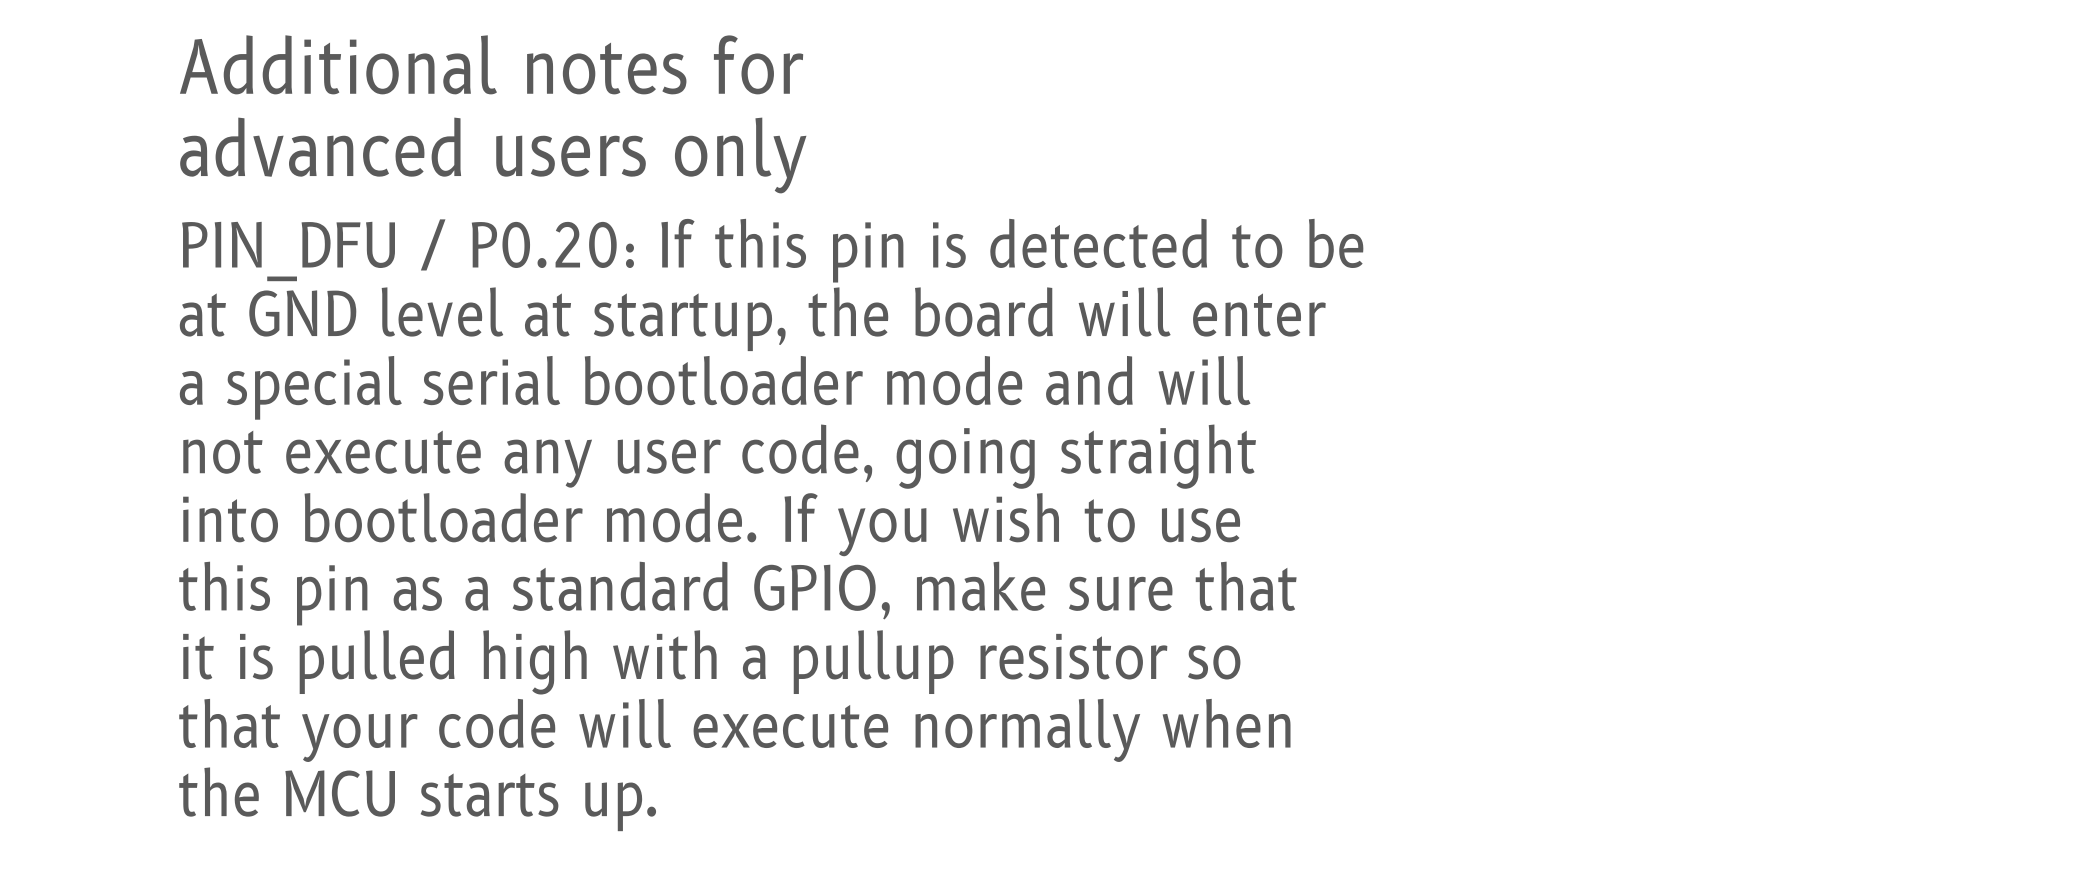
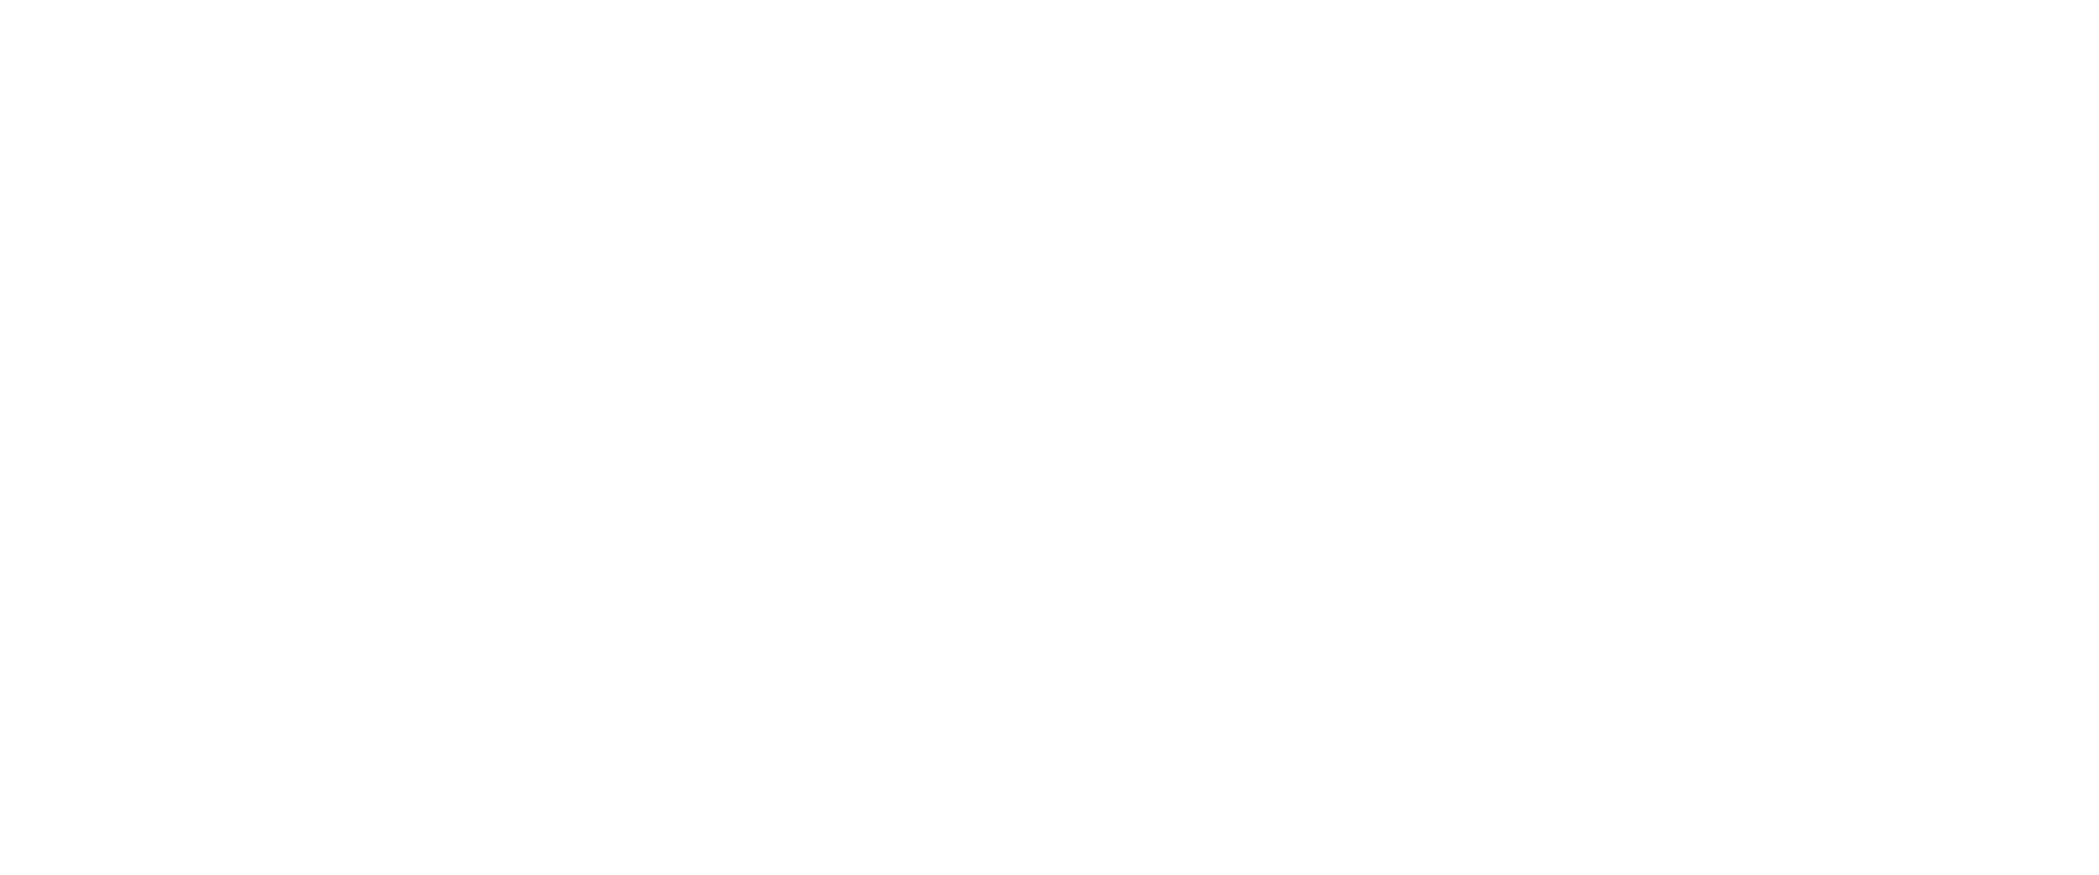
text: Additional notes for (491, 64) -> none
text: advanced users only (493, 155) -> none
text: PIN_DFU / P0.20: If this pin is detected to be (772, 250) -> none
text: at GND level at startup, the board will enter (752, 319) -> none
text: a special serial bootloader mode and will (715, 387) -> none
text: not execute any user code, going straight (719, 456) -> none
text: into bootloader mode. If you wish to use (711, 524) -> none
text: this pin as a standard GPIO, make sure that (737, 593) -> none
text: it is pulled high with a pullup resistor so (711, 662) -> none
text: that your code will execute normally when (734, 730) -> none
text: the MCU starts up. (417, 799) -> none

